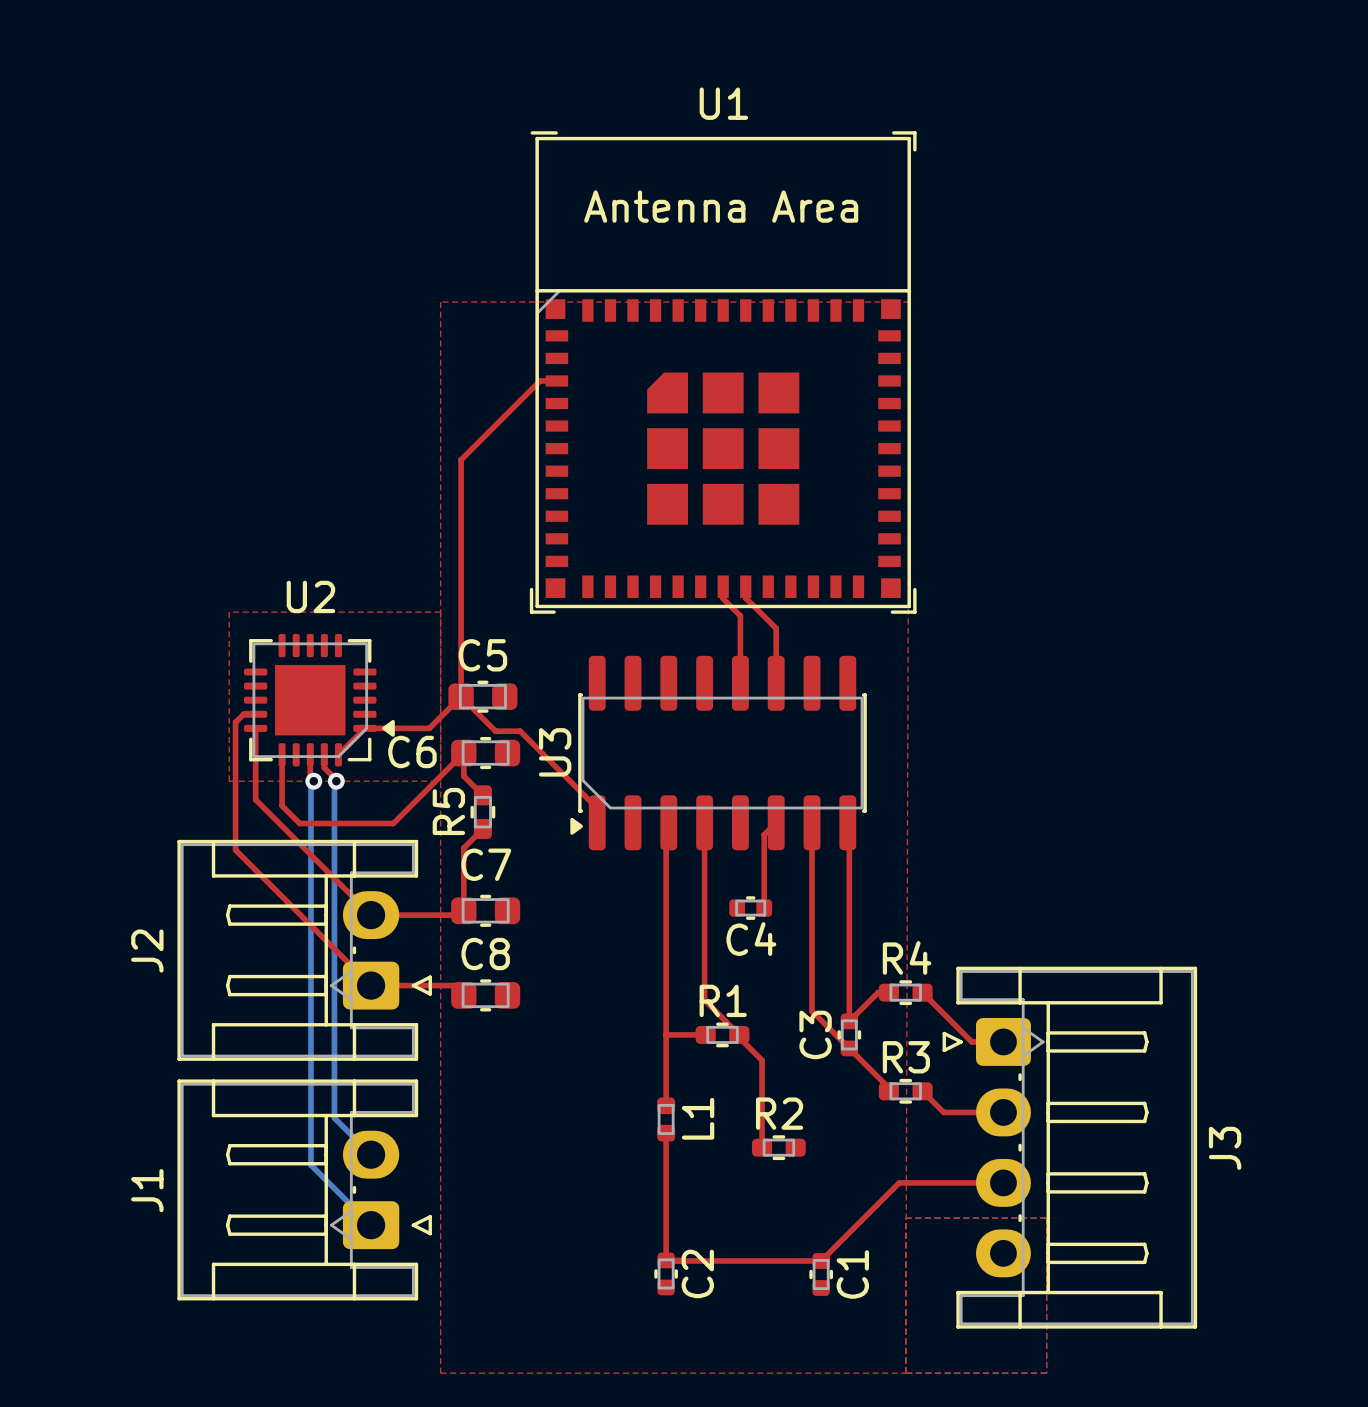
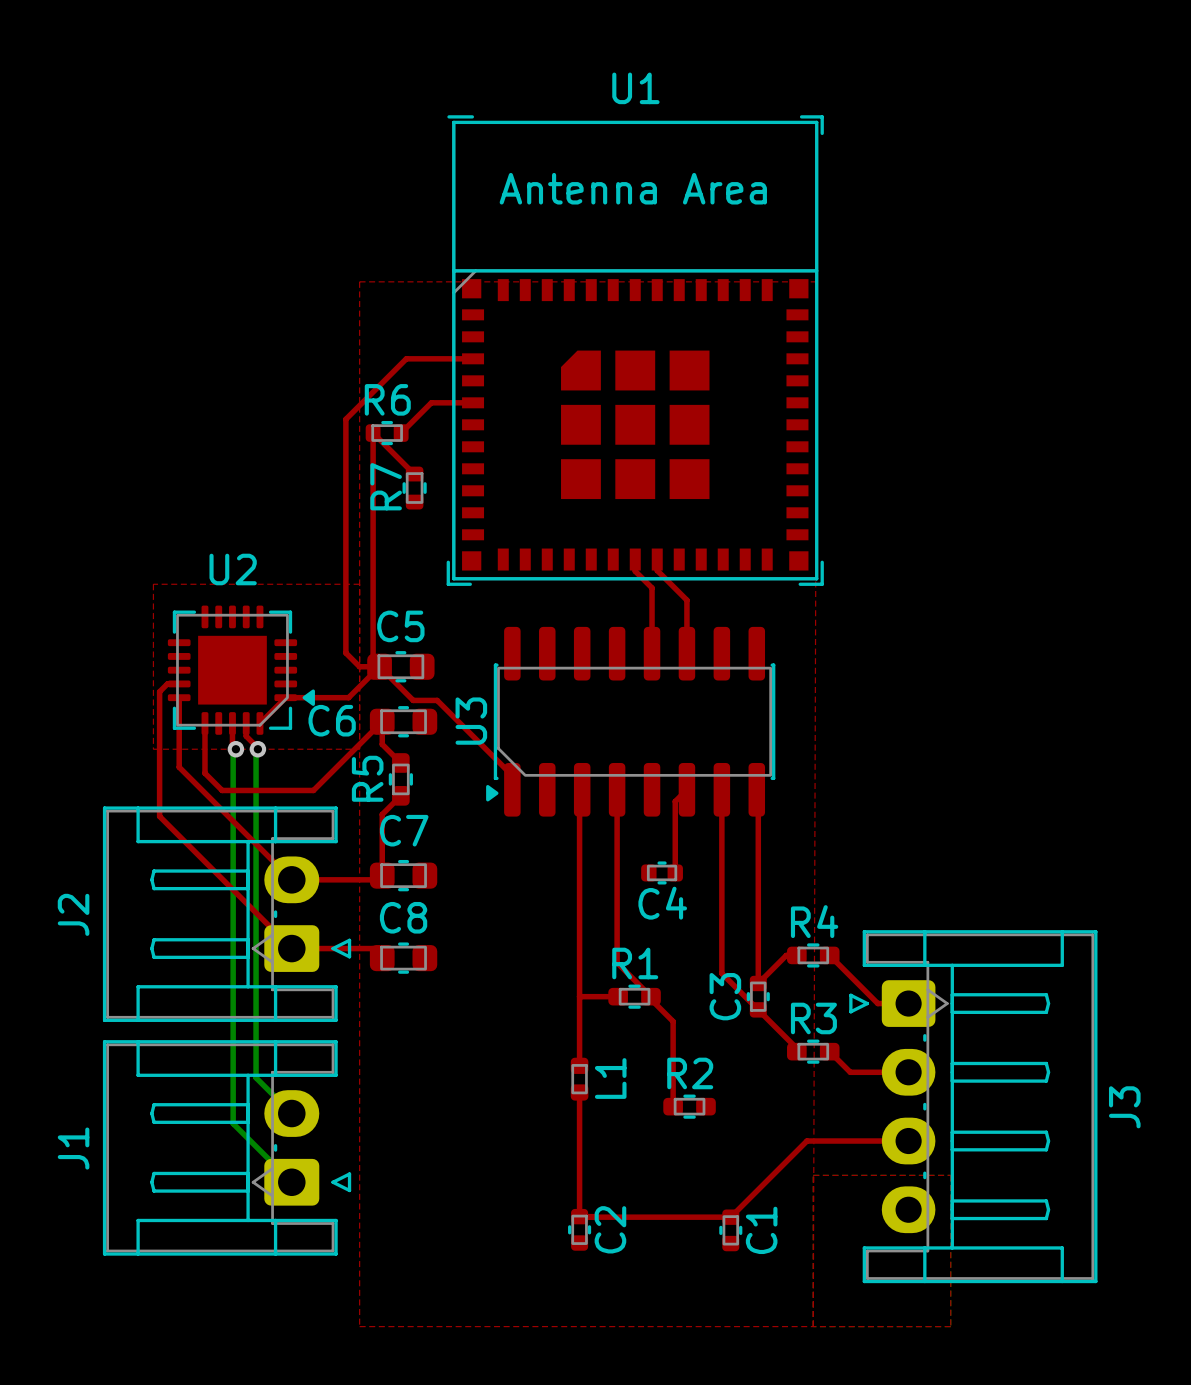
top track: (539, 380) (461, 459) (461, 696) -> (456, 358) (406, 358) (345, 419) (345, 653) (359, 666) (379, 666) (373, 660) (373, 433) (414, 474)
top track: none -> (473, 402) (431, 402) (401, 433)
R6: none -> (387, 433)
R7: none -> (414, 488)

